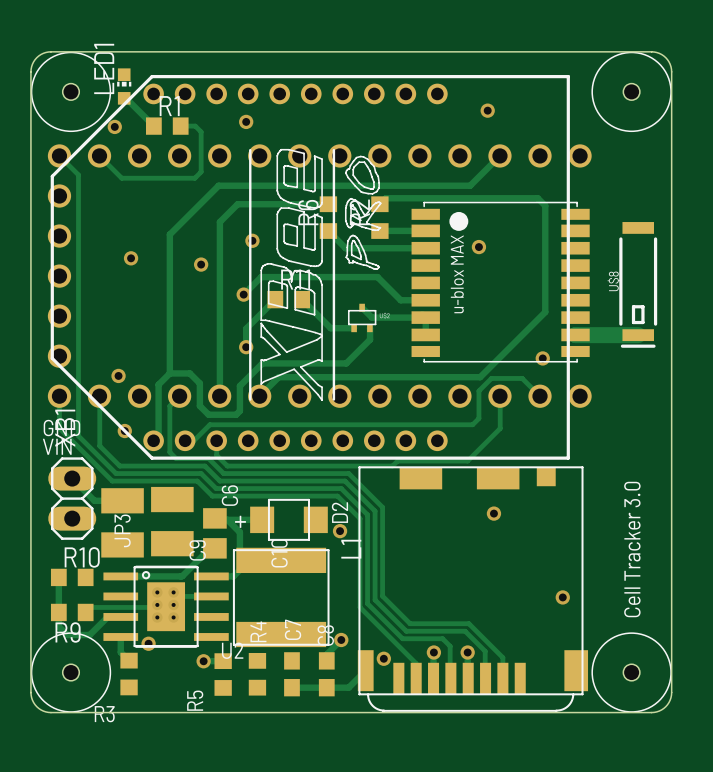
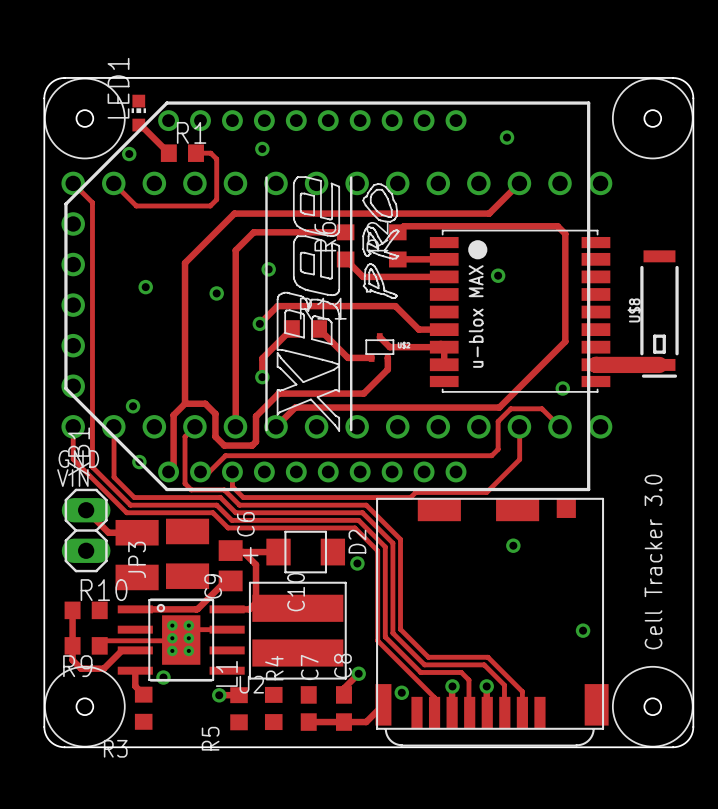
L1 footprint: [232, 547, 330, 648] -> [248, 581, 347, 680]
L1 name position: L1 (351, 549) -> L1 (226, 673)

